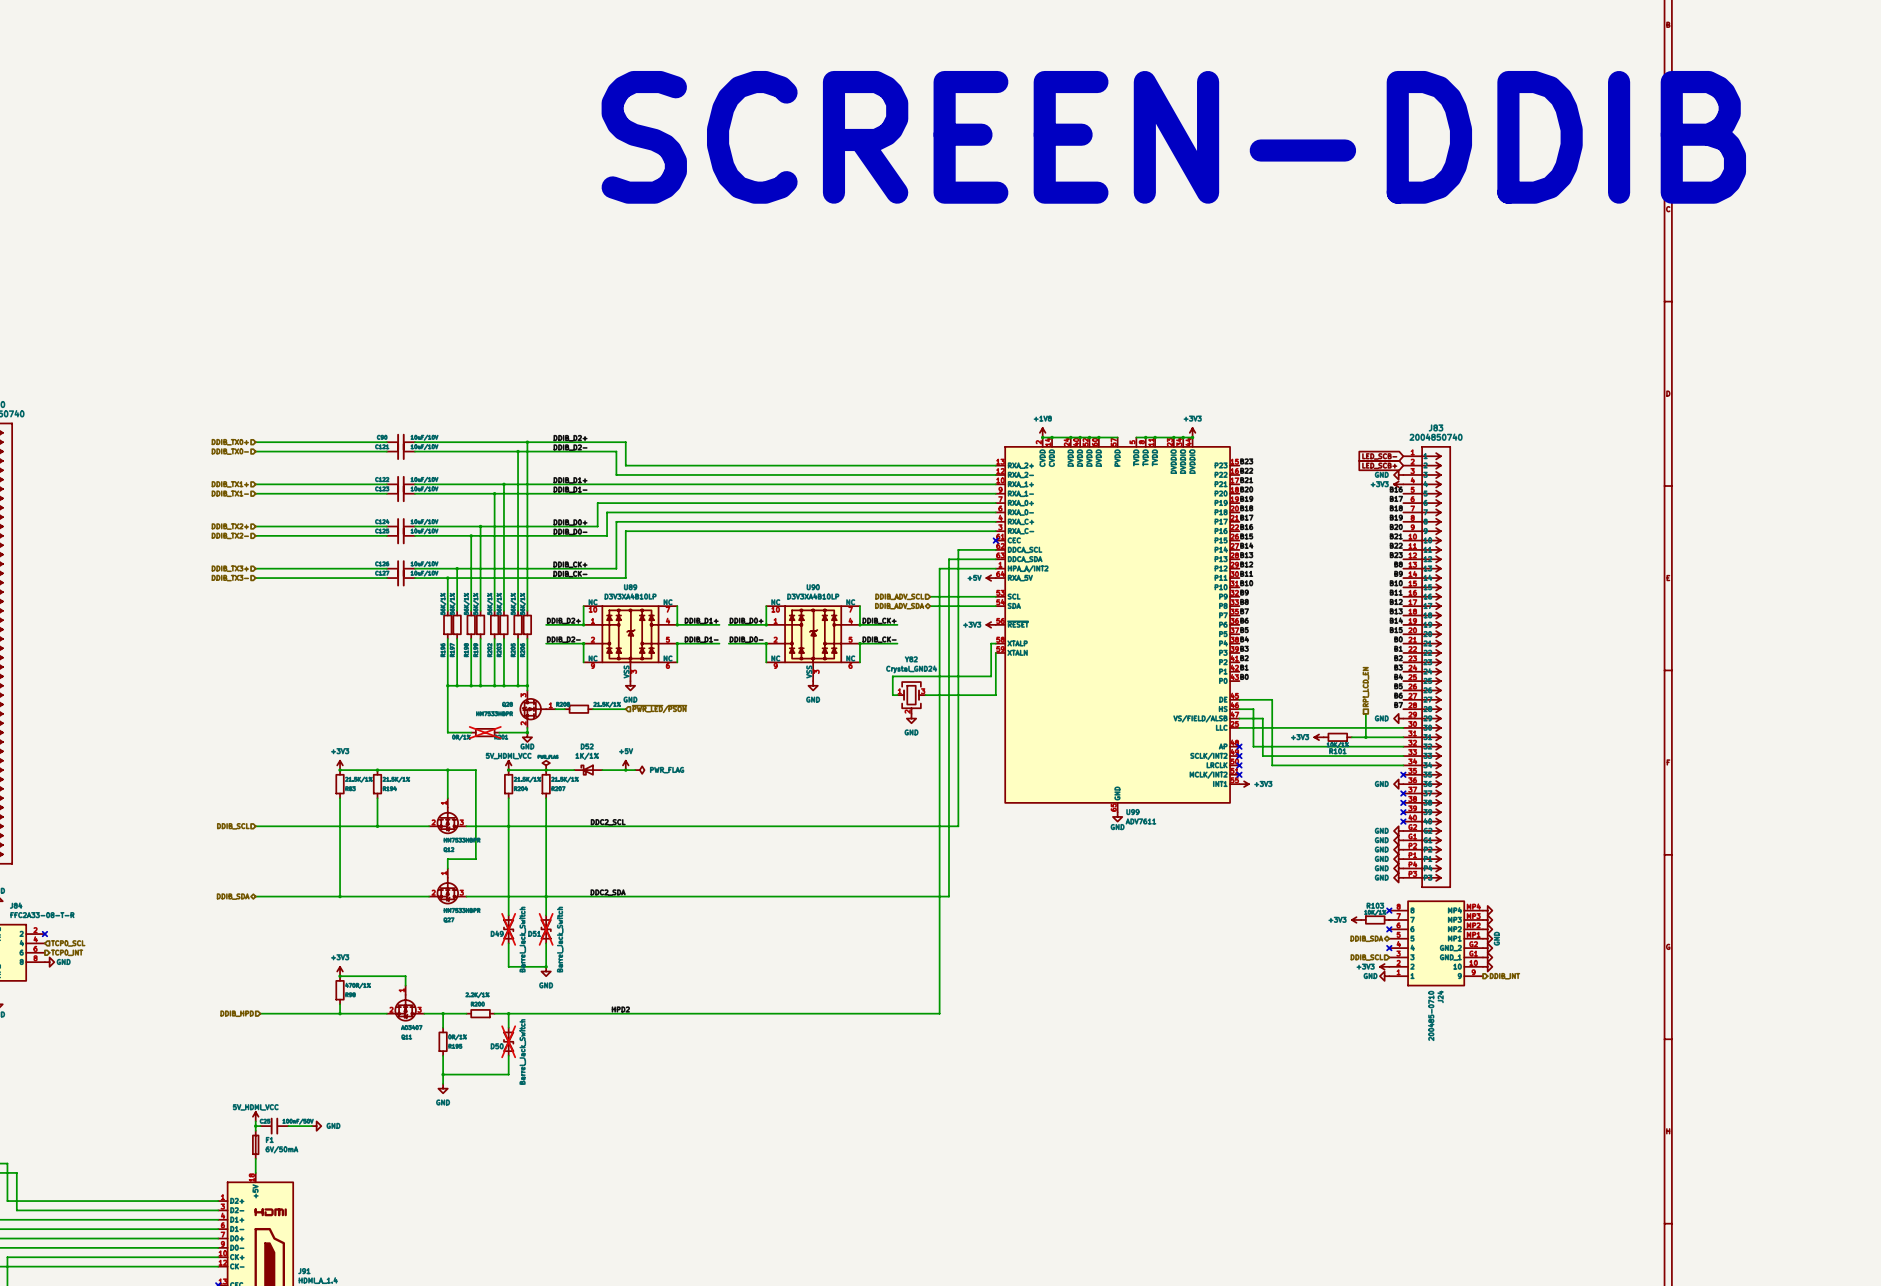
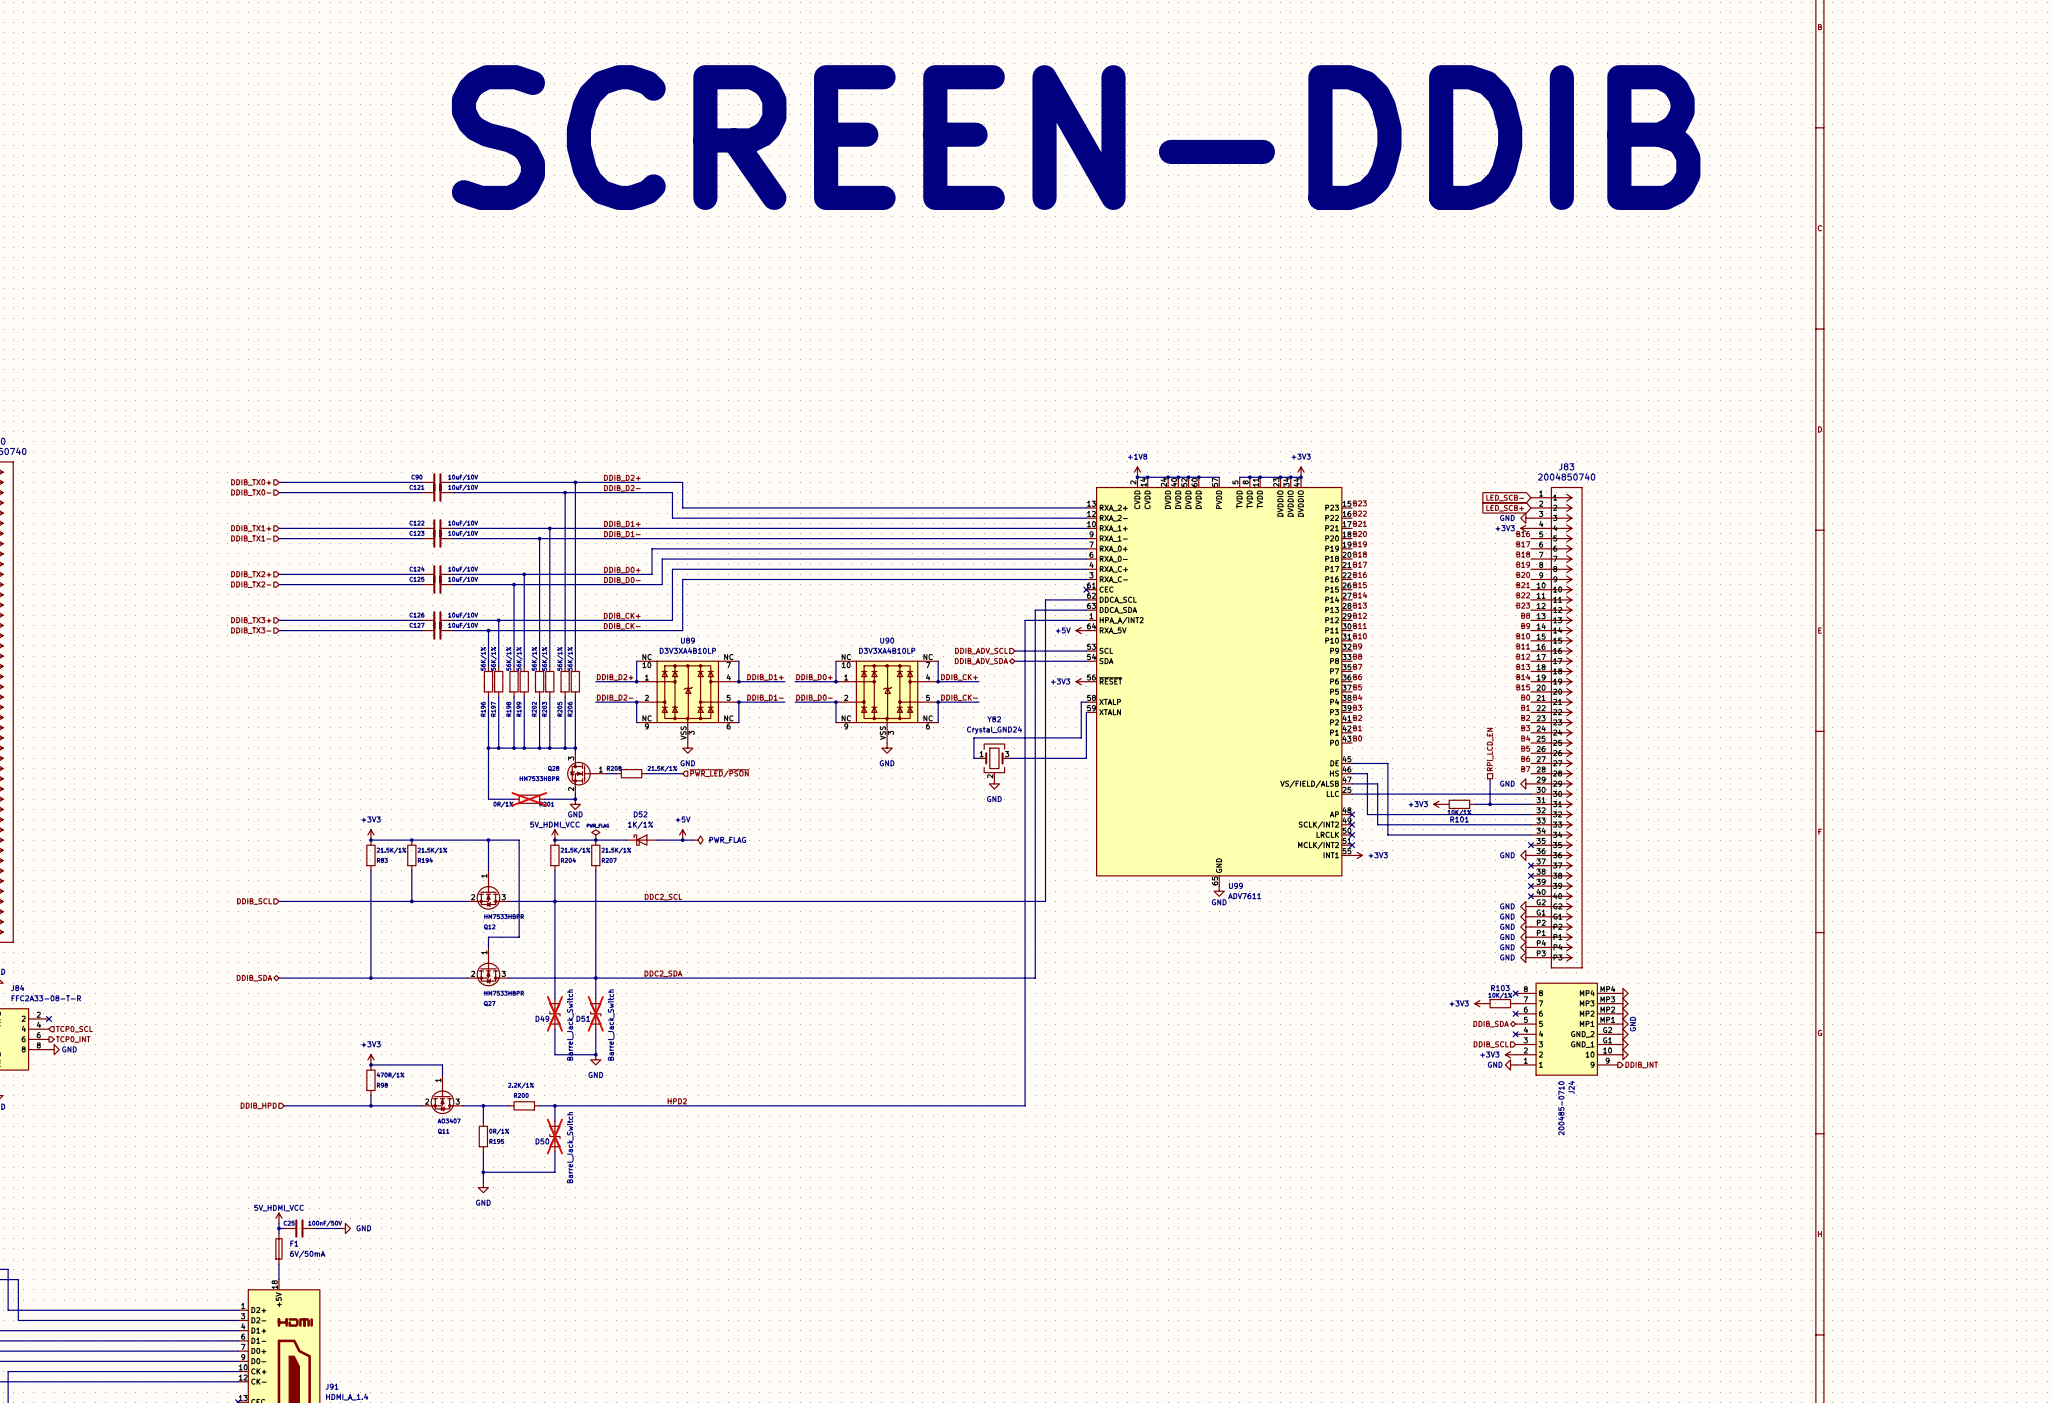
text: none -> SCREEN-DDIB (1076, 137)
text: SCREEN-DDIB (1173, 137) -> none

